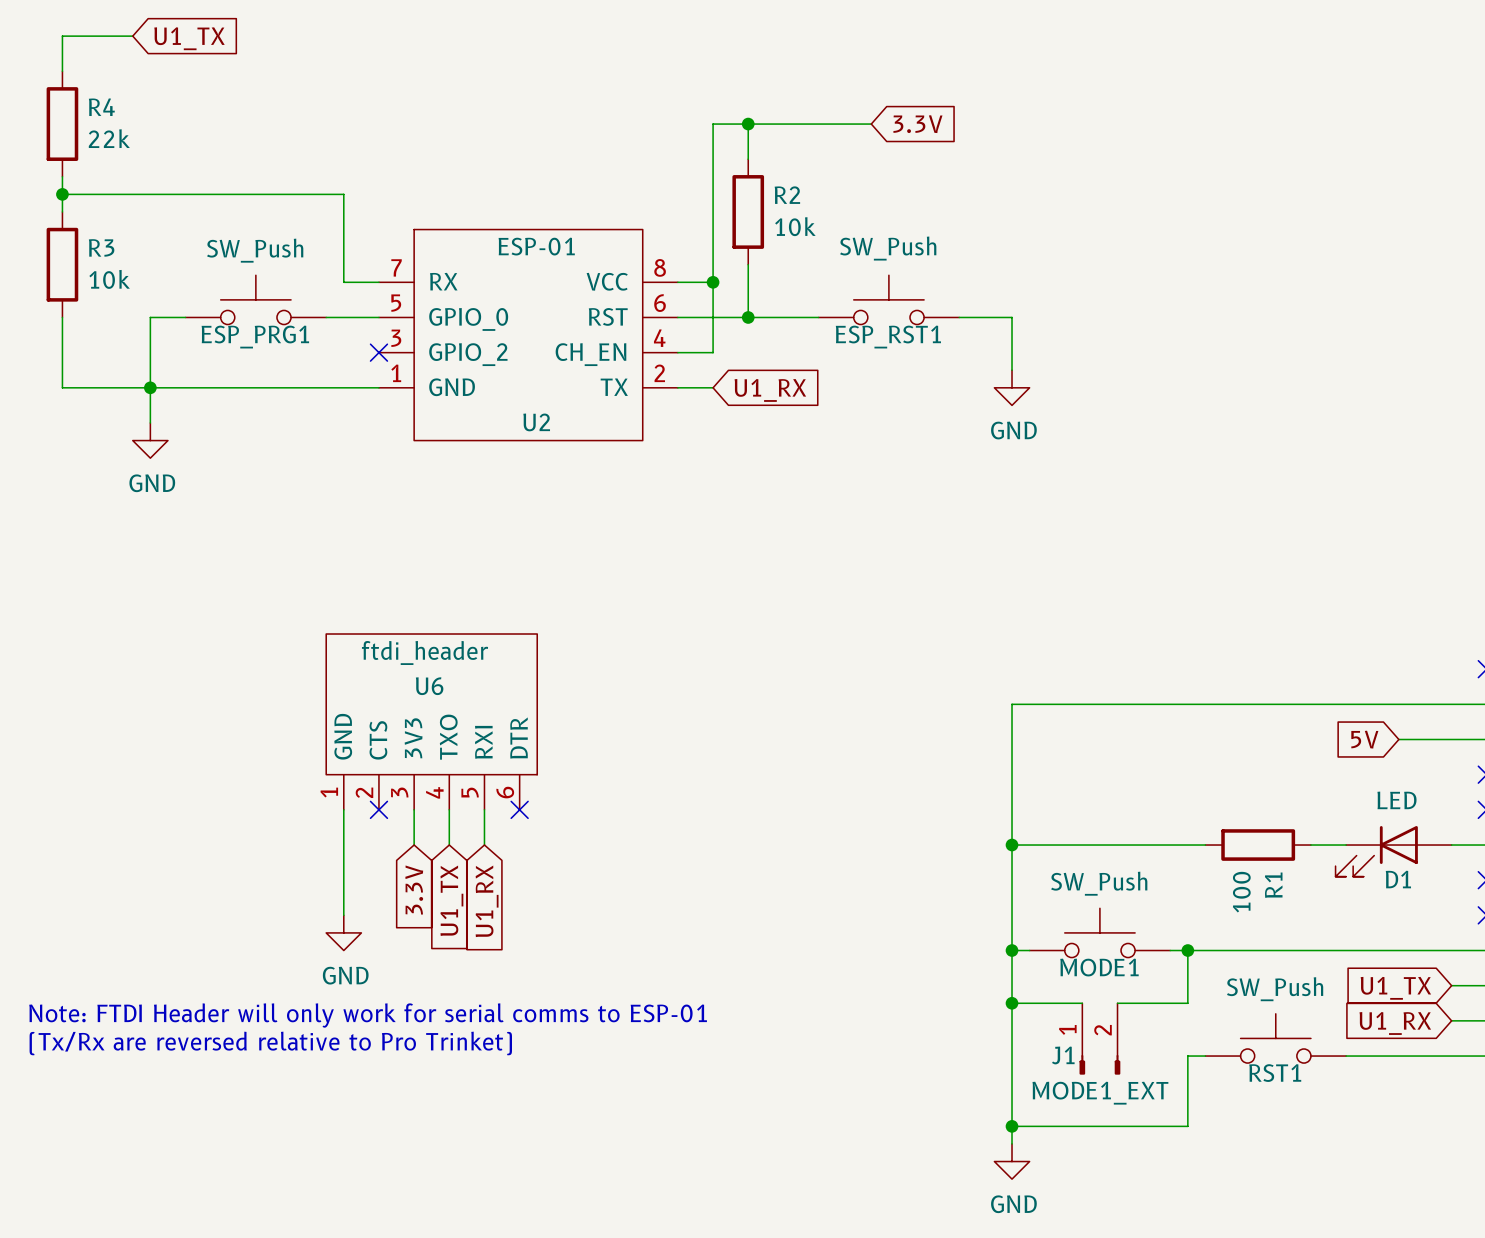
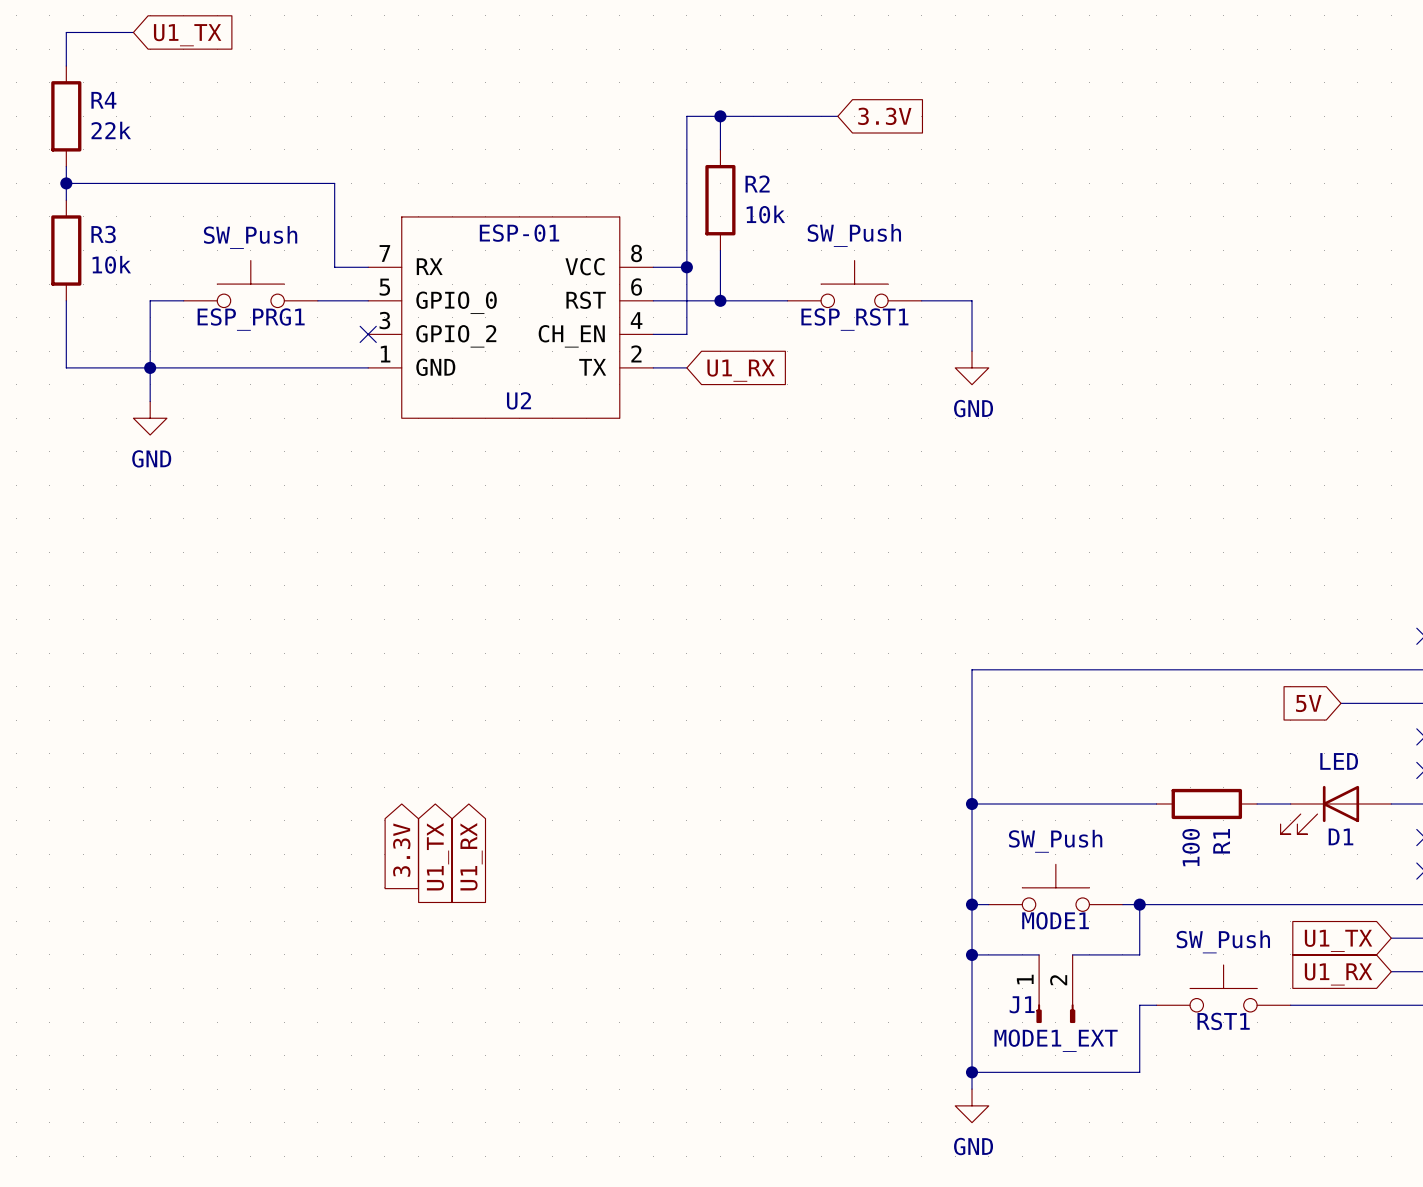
U6: ftdi_header (431, 721) -> none
wire: (343, 809) (343, 915) -> none
no-connect mark: (378, 809) -> none
wire: (414, 809) (414, 845) -> none
wire: (449, 809) (449, 845) -> none
wire: (484, 809) (484, 845) -> none
no-connect mark: (519, 809) -> none
power symbol: GND (343, 932) -> none
text: Note: FTDI Header will only work for serial comms to ESP-01 (368, 1015) -> none
text: (Tx/Rx are reversed relative to Pro Trinket) (270, 1043) -> none

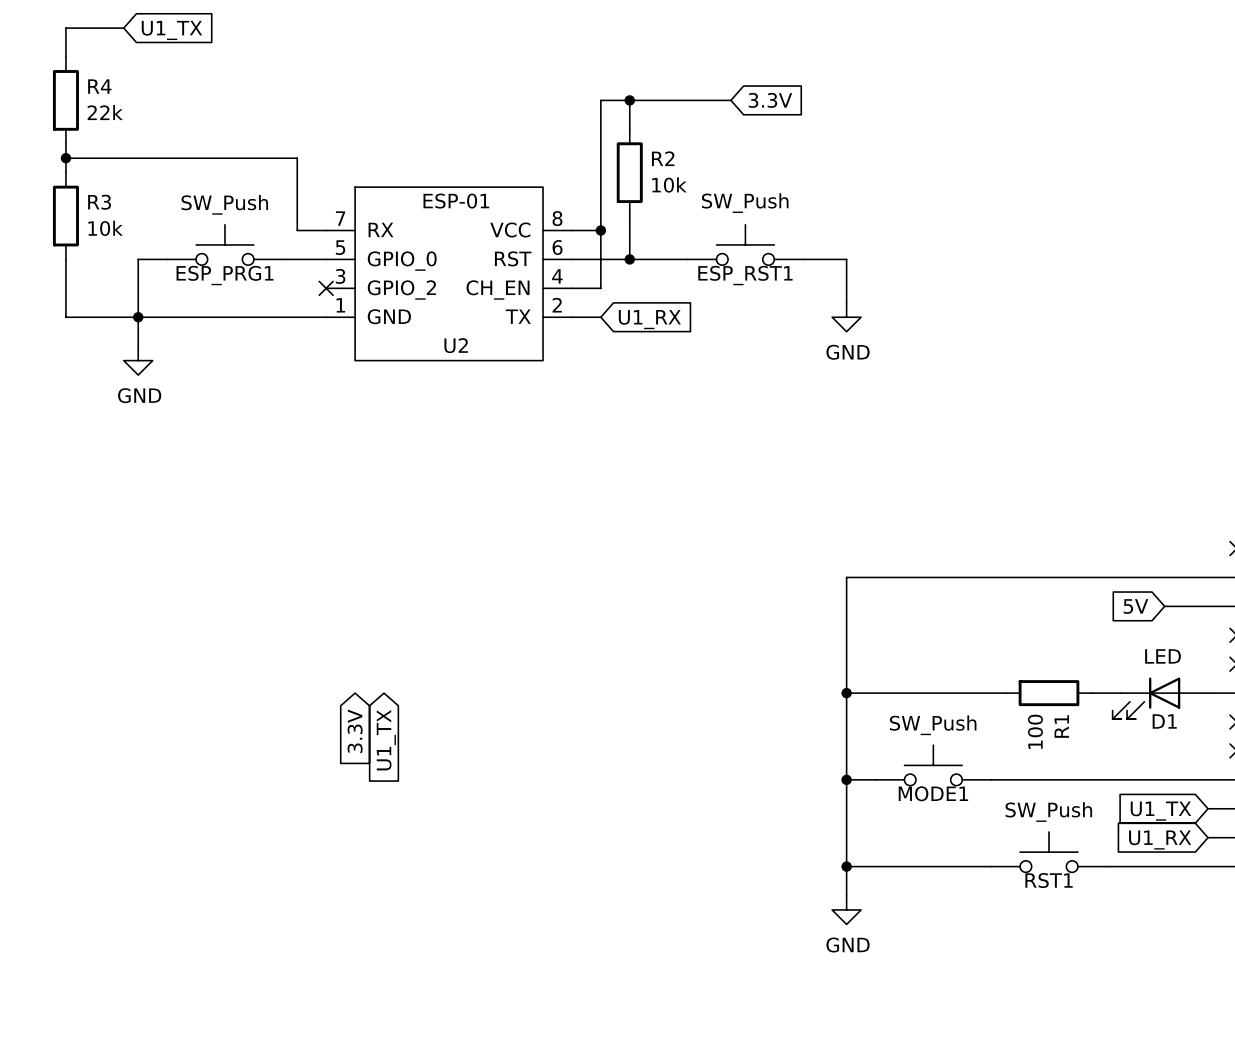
global label: U1_RX (471, 856) -> none
MODE1 position: (1055, 887) -> (933, 765)
wire: (1122, 904) (1139, 904) (1139, 954) (1072, 954) -> none
junction: (1139, 904) -> none
wire: (972, 954) (1039, 954) -> none
junction: (972, 954) -> none
J1: MODE1_EXT (1055, 988) -> none
RST1 position: (1223, 988) -> (1049, 852)
wire: none -> (846, 866) (991, 866)
junction: none -> (846, 866)
wire: (1156, 1005) (1139, 1005) (1139, 1072) (972, 1072) -> none
wire: (972, 1038) (972, 1089) -> none
junction: (972, 1072) -> none
power symbol position: GND (972, 1105) -> GND (846, 909)

